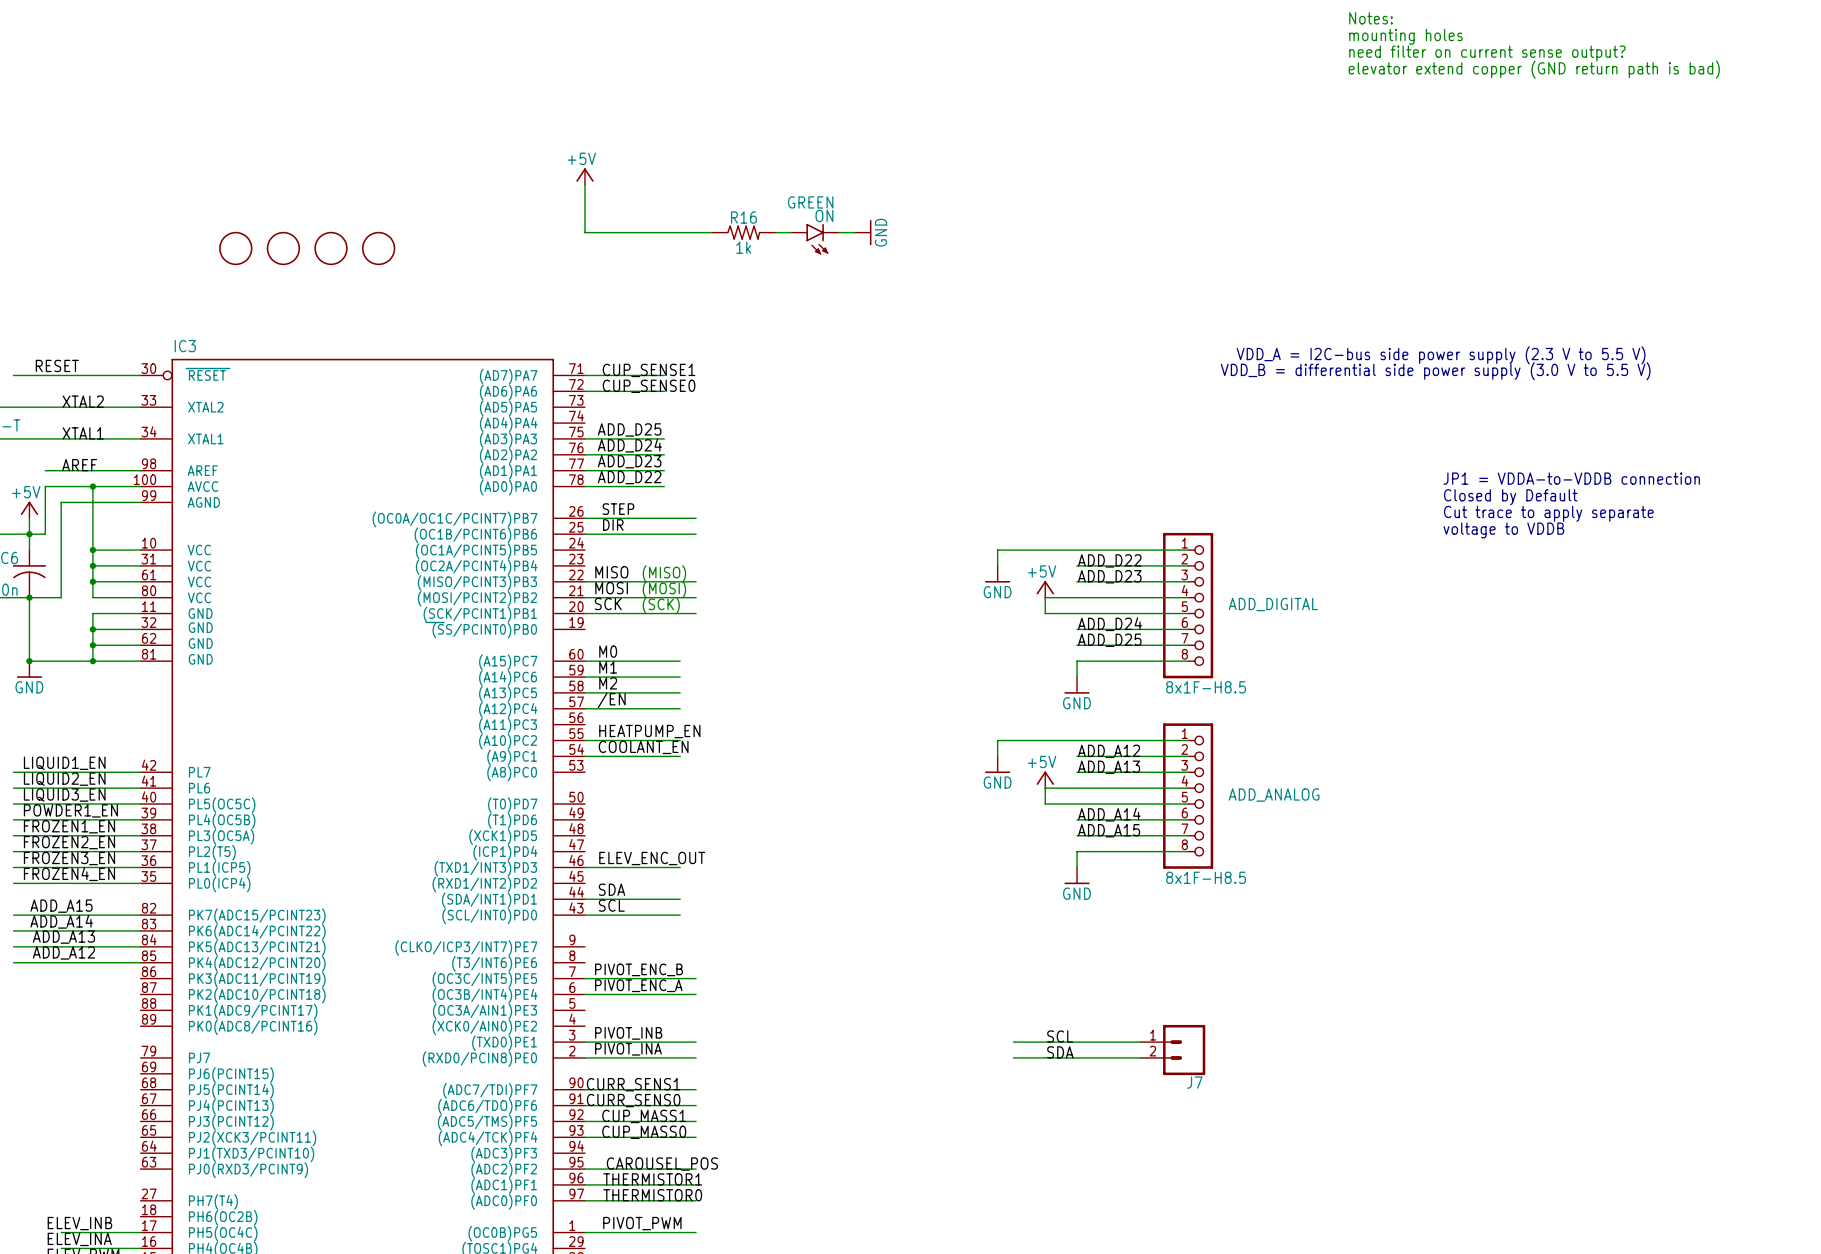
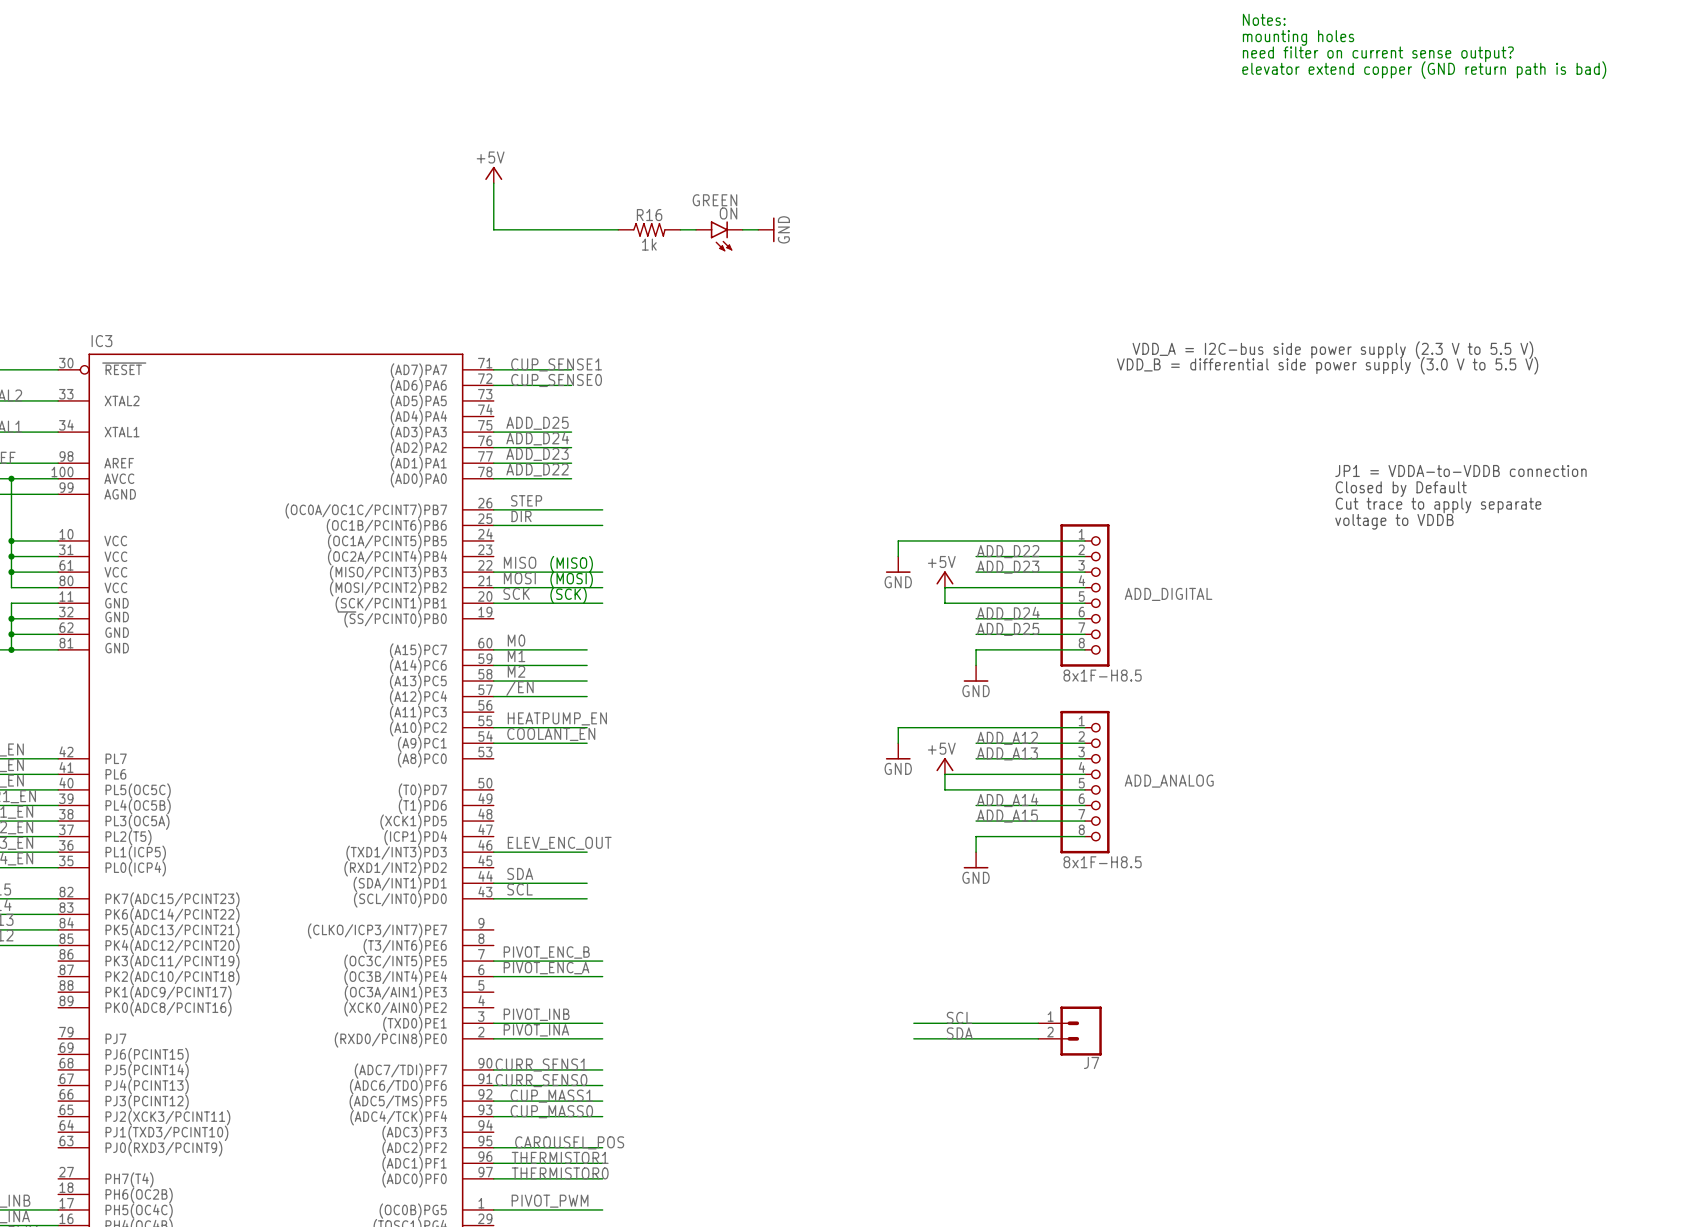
part: (235, 248) -> none
part: (283, 248) -> none
part: (331, 248) -> none
part: (378, 248) -> none

